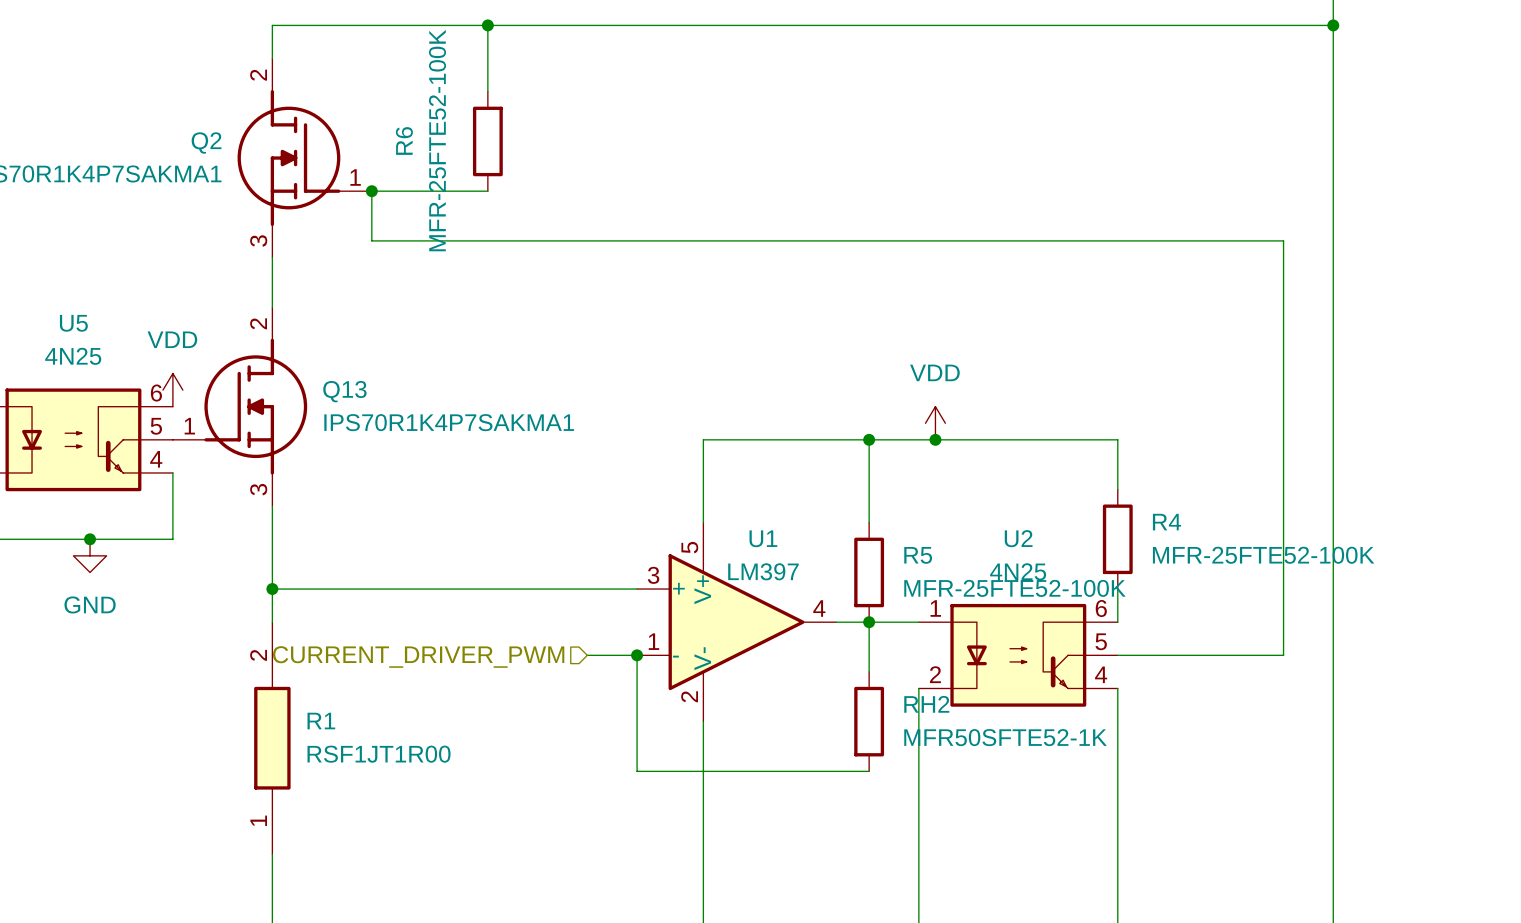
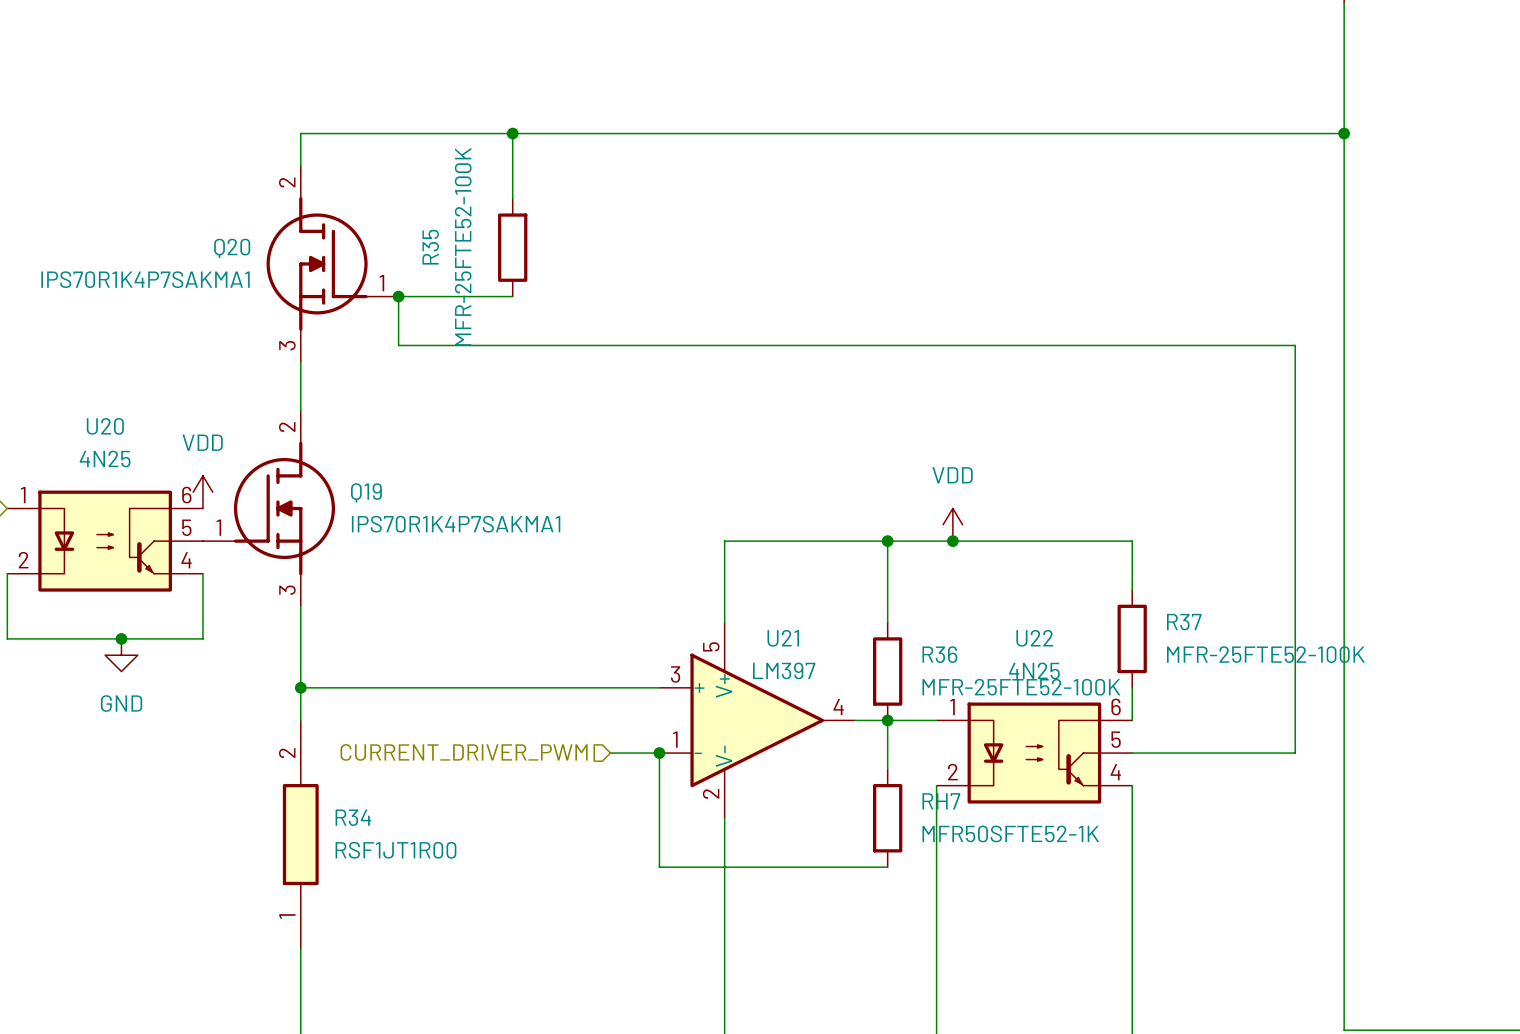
R6 name: R6 (404, 141) -> R35 (430, 247)
Q2 name: Q2 (206, 142) -> Q20 (232, 248)
U5 name: U5 (73, 323) -> U20 (105, 426)
Q13 name: Q13 (344, 391) -> Q19 (366, 492)
R4 name: R4 (1166, 522) -> R37 (1184, 622)
U1 name: U1 (763, 538) -> U21 (783, 638)
U2 name: U2 (1018, 538) -> U22 (1034, 638)
R5 name: R5 (918, 555) -> R36 (939, 654)
RH2 name: RH2 (926, 704) -> RH7 (941, 801)
R1 name: R1 (321, 721) -> R34 (353, 817)

